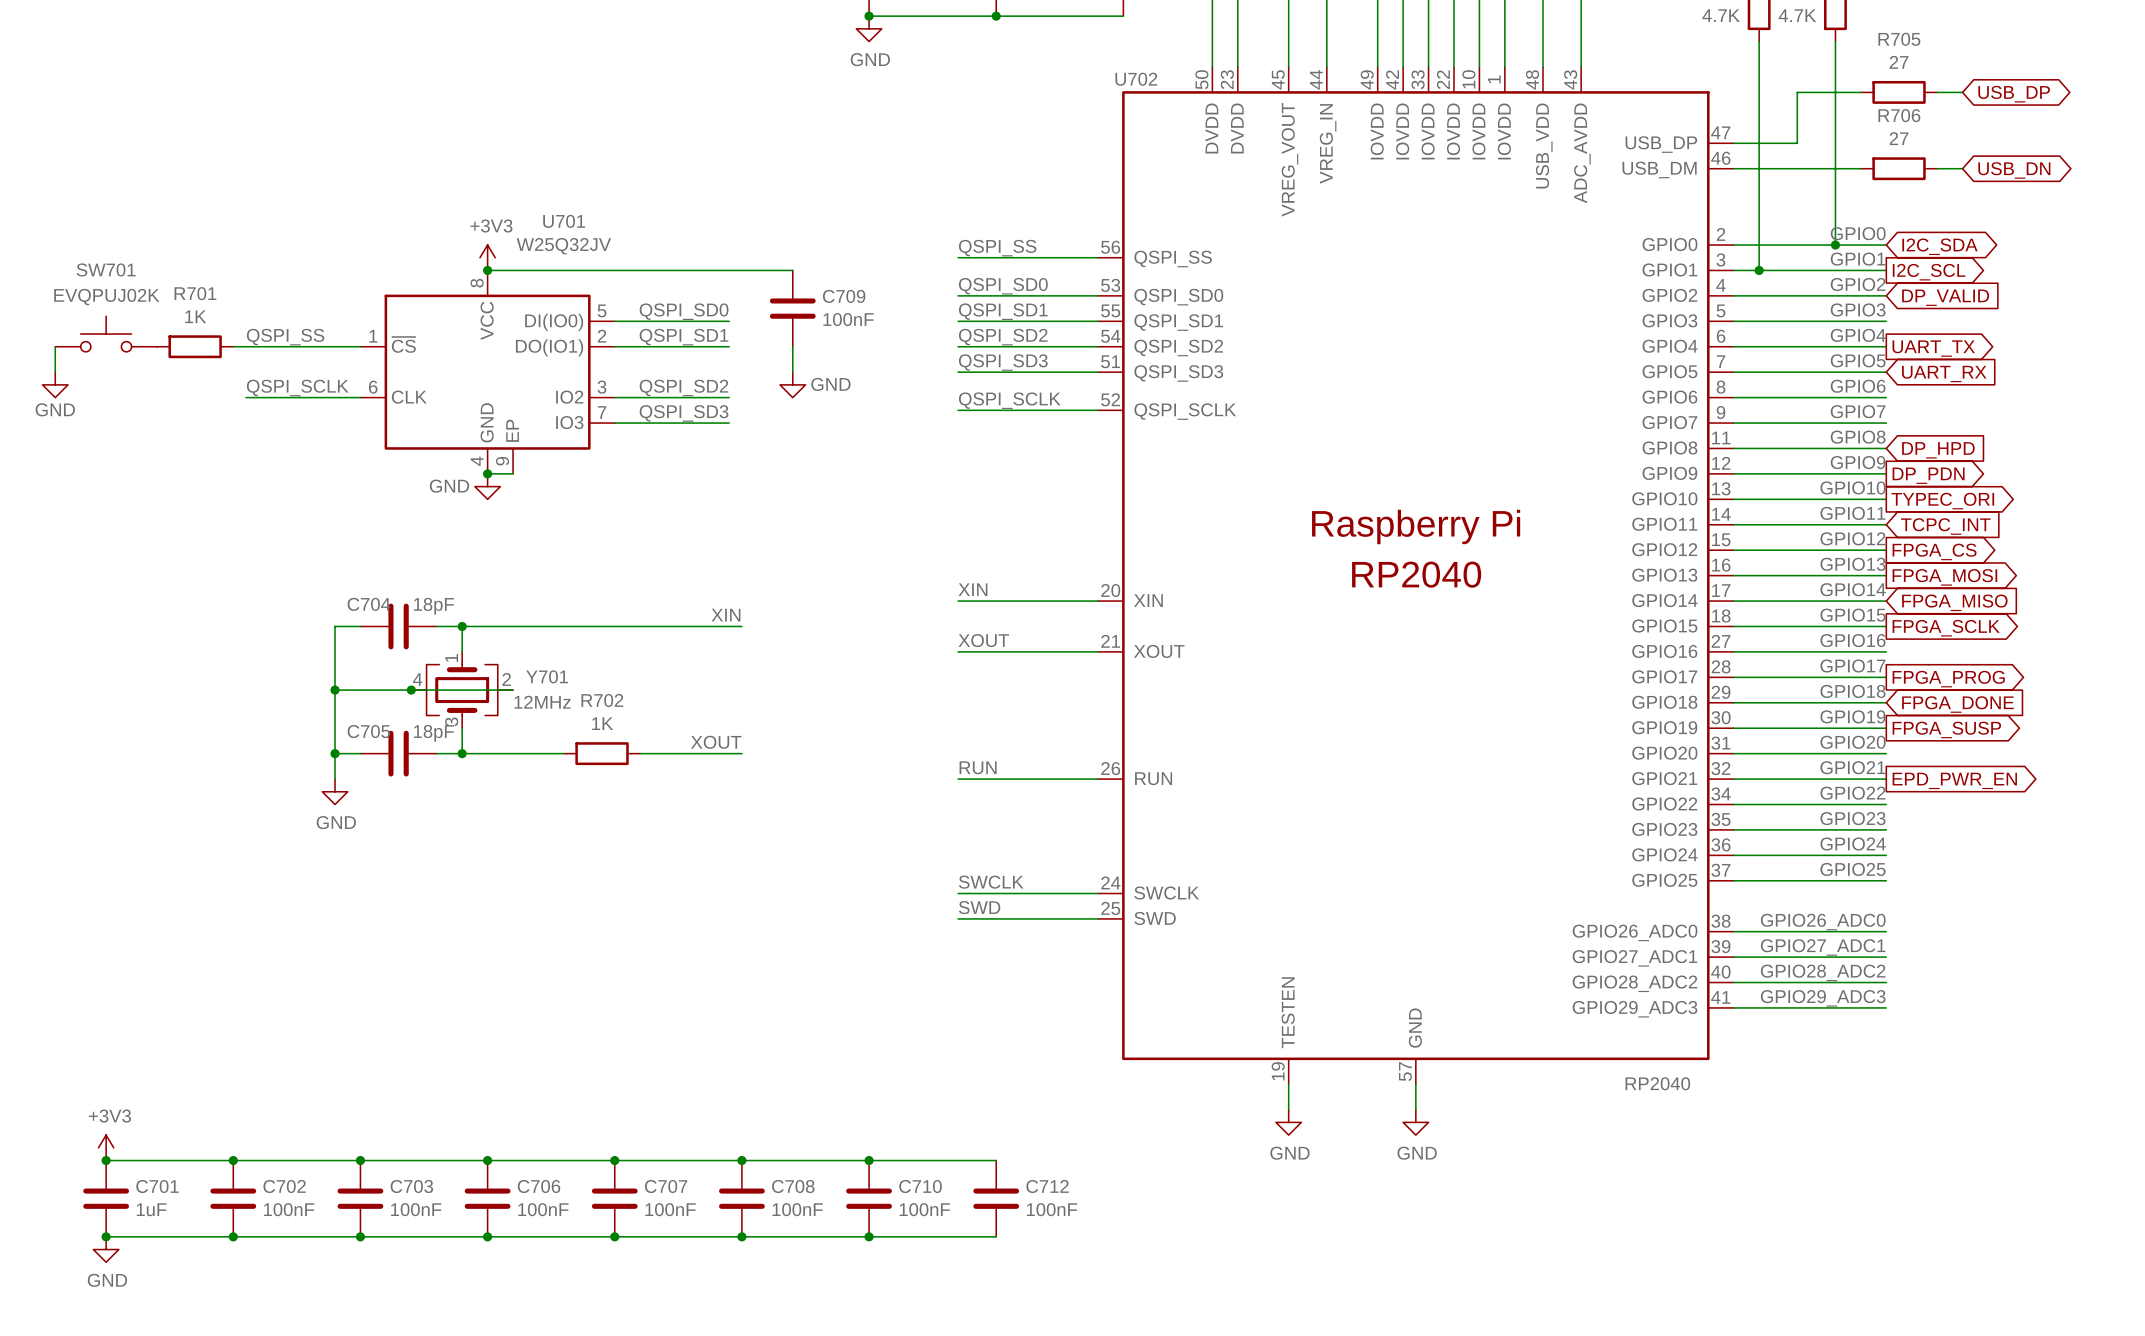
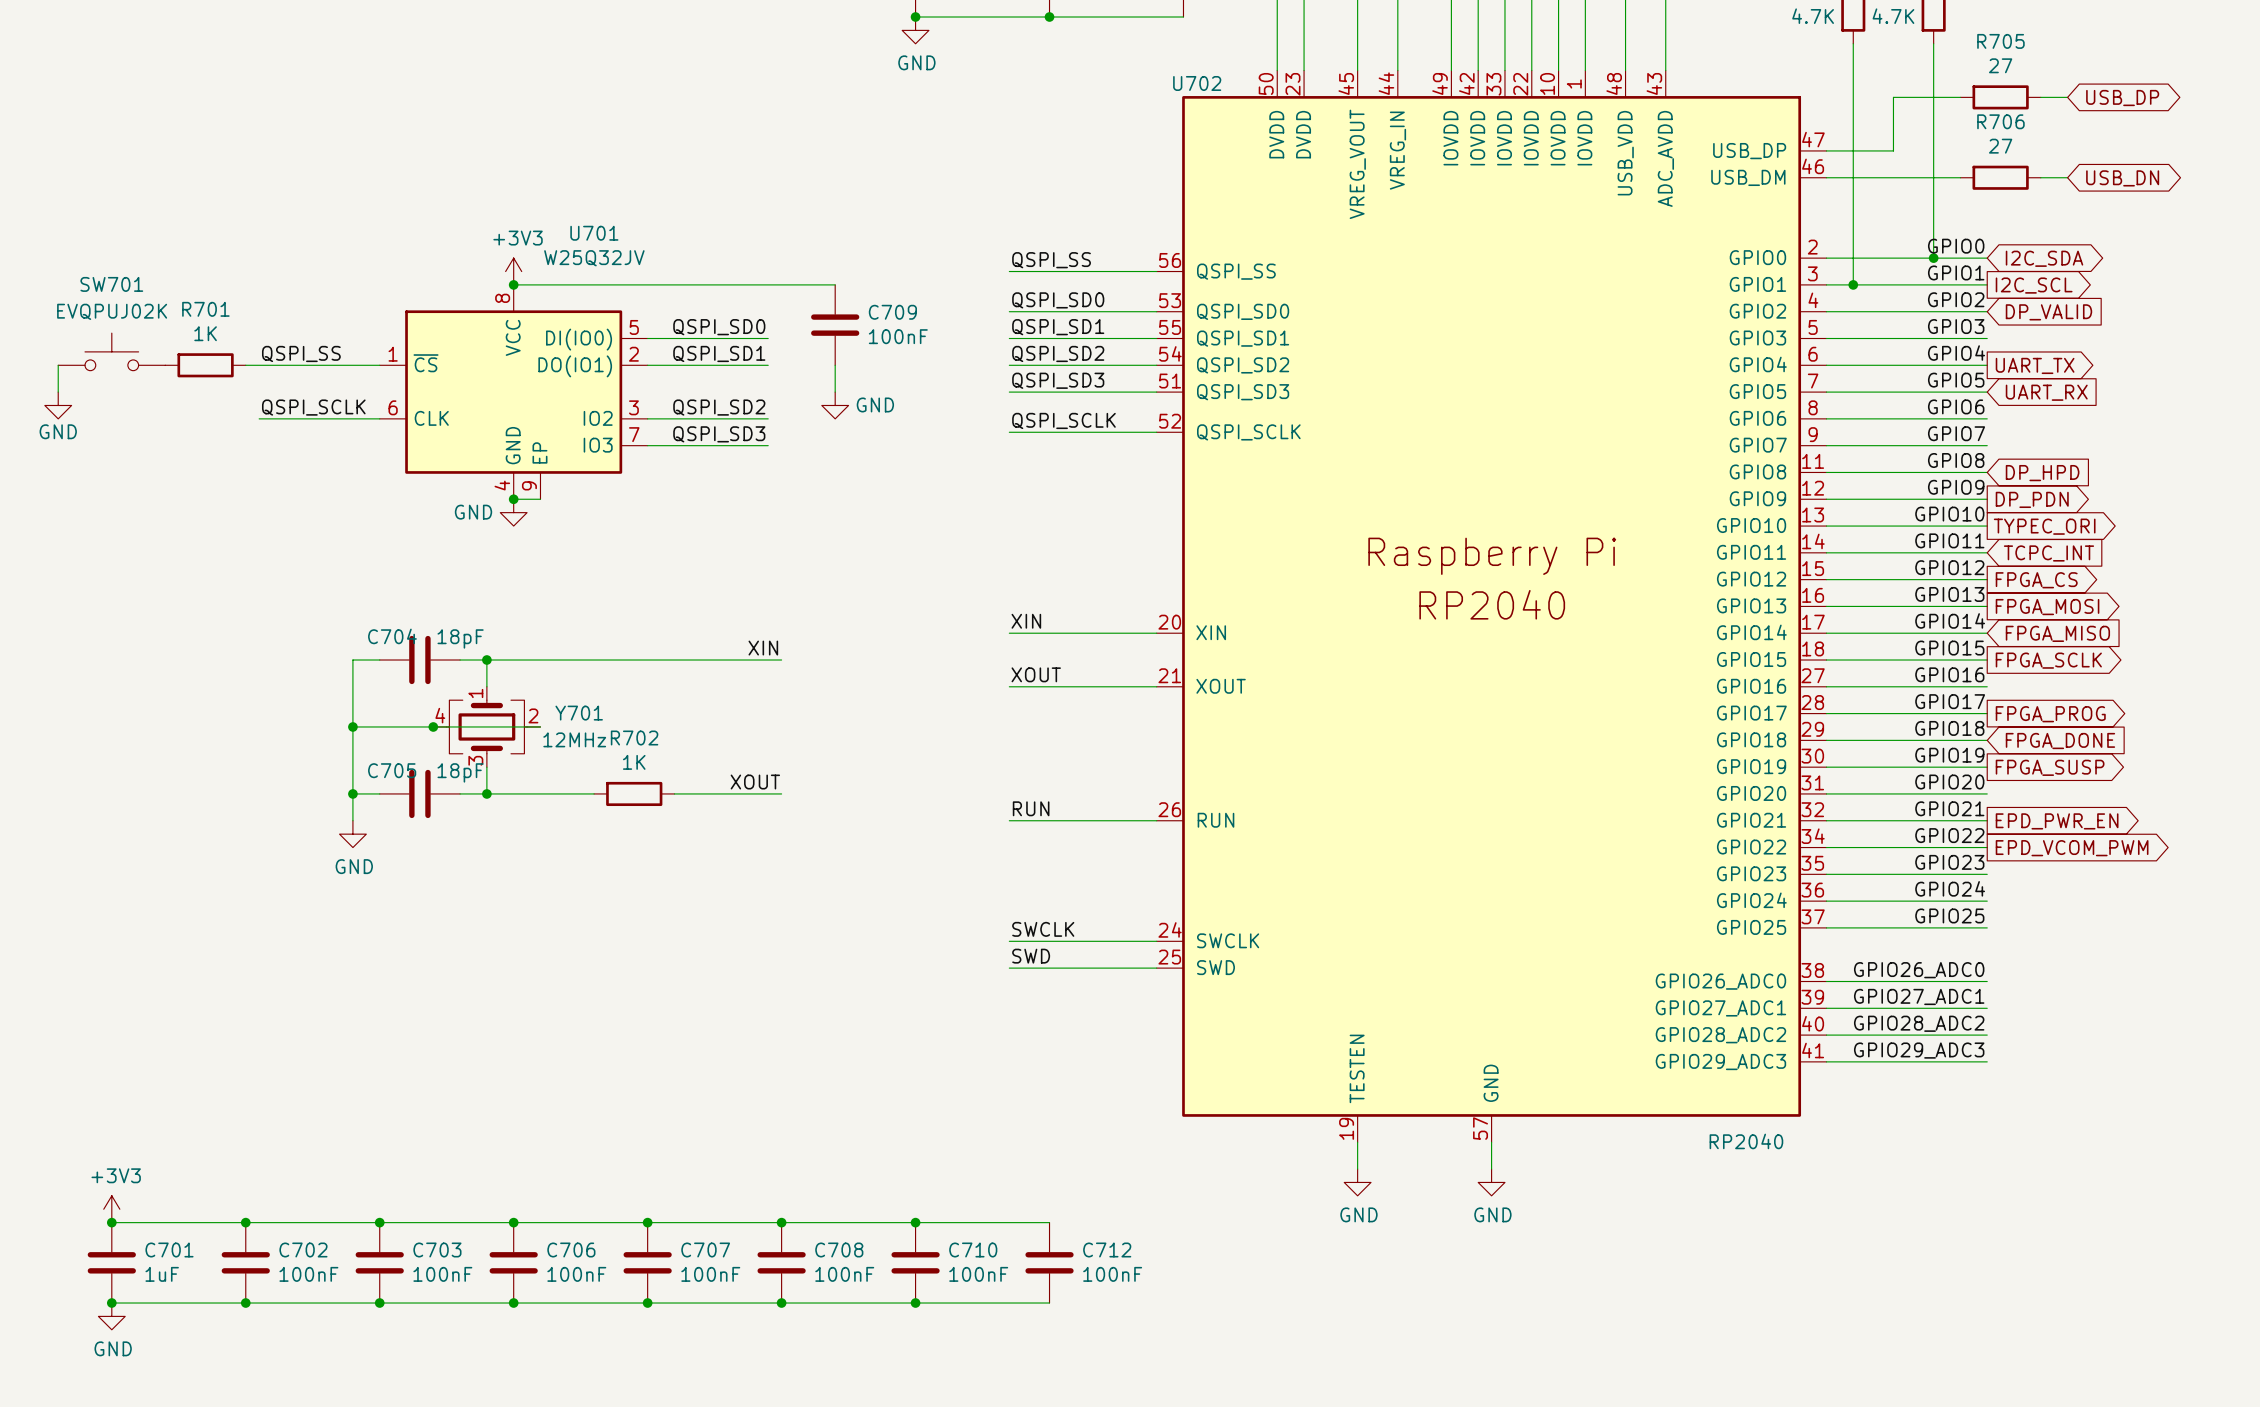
global label: none -> EPD_VCOM_PWM (2072, 848)

